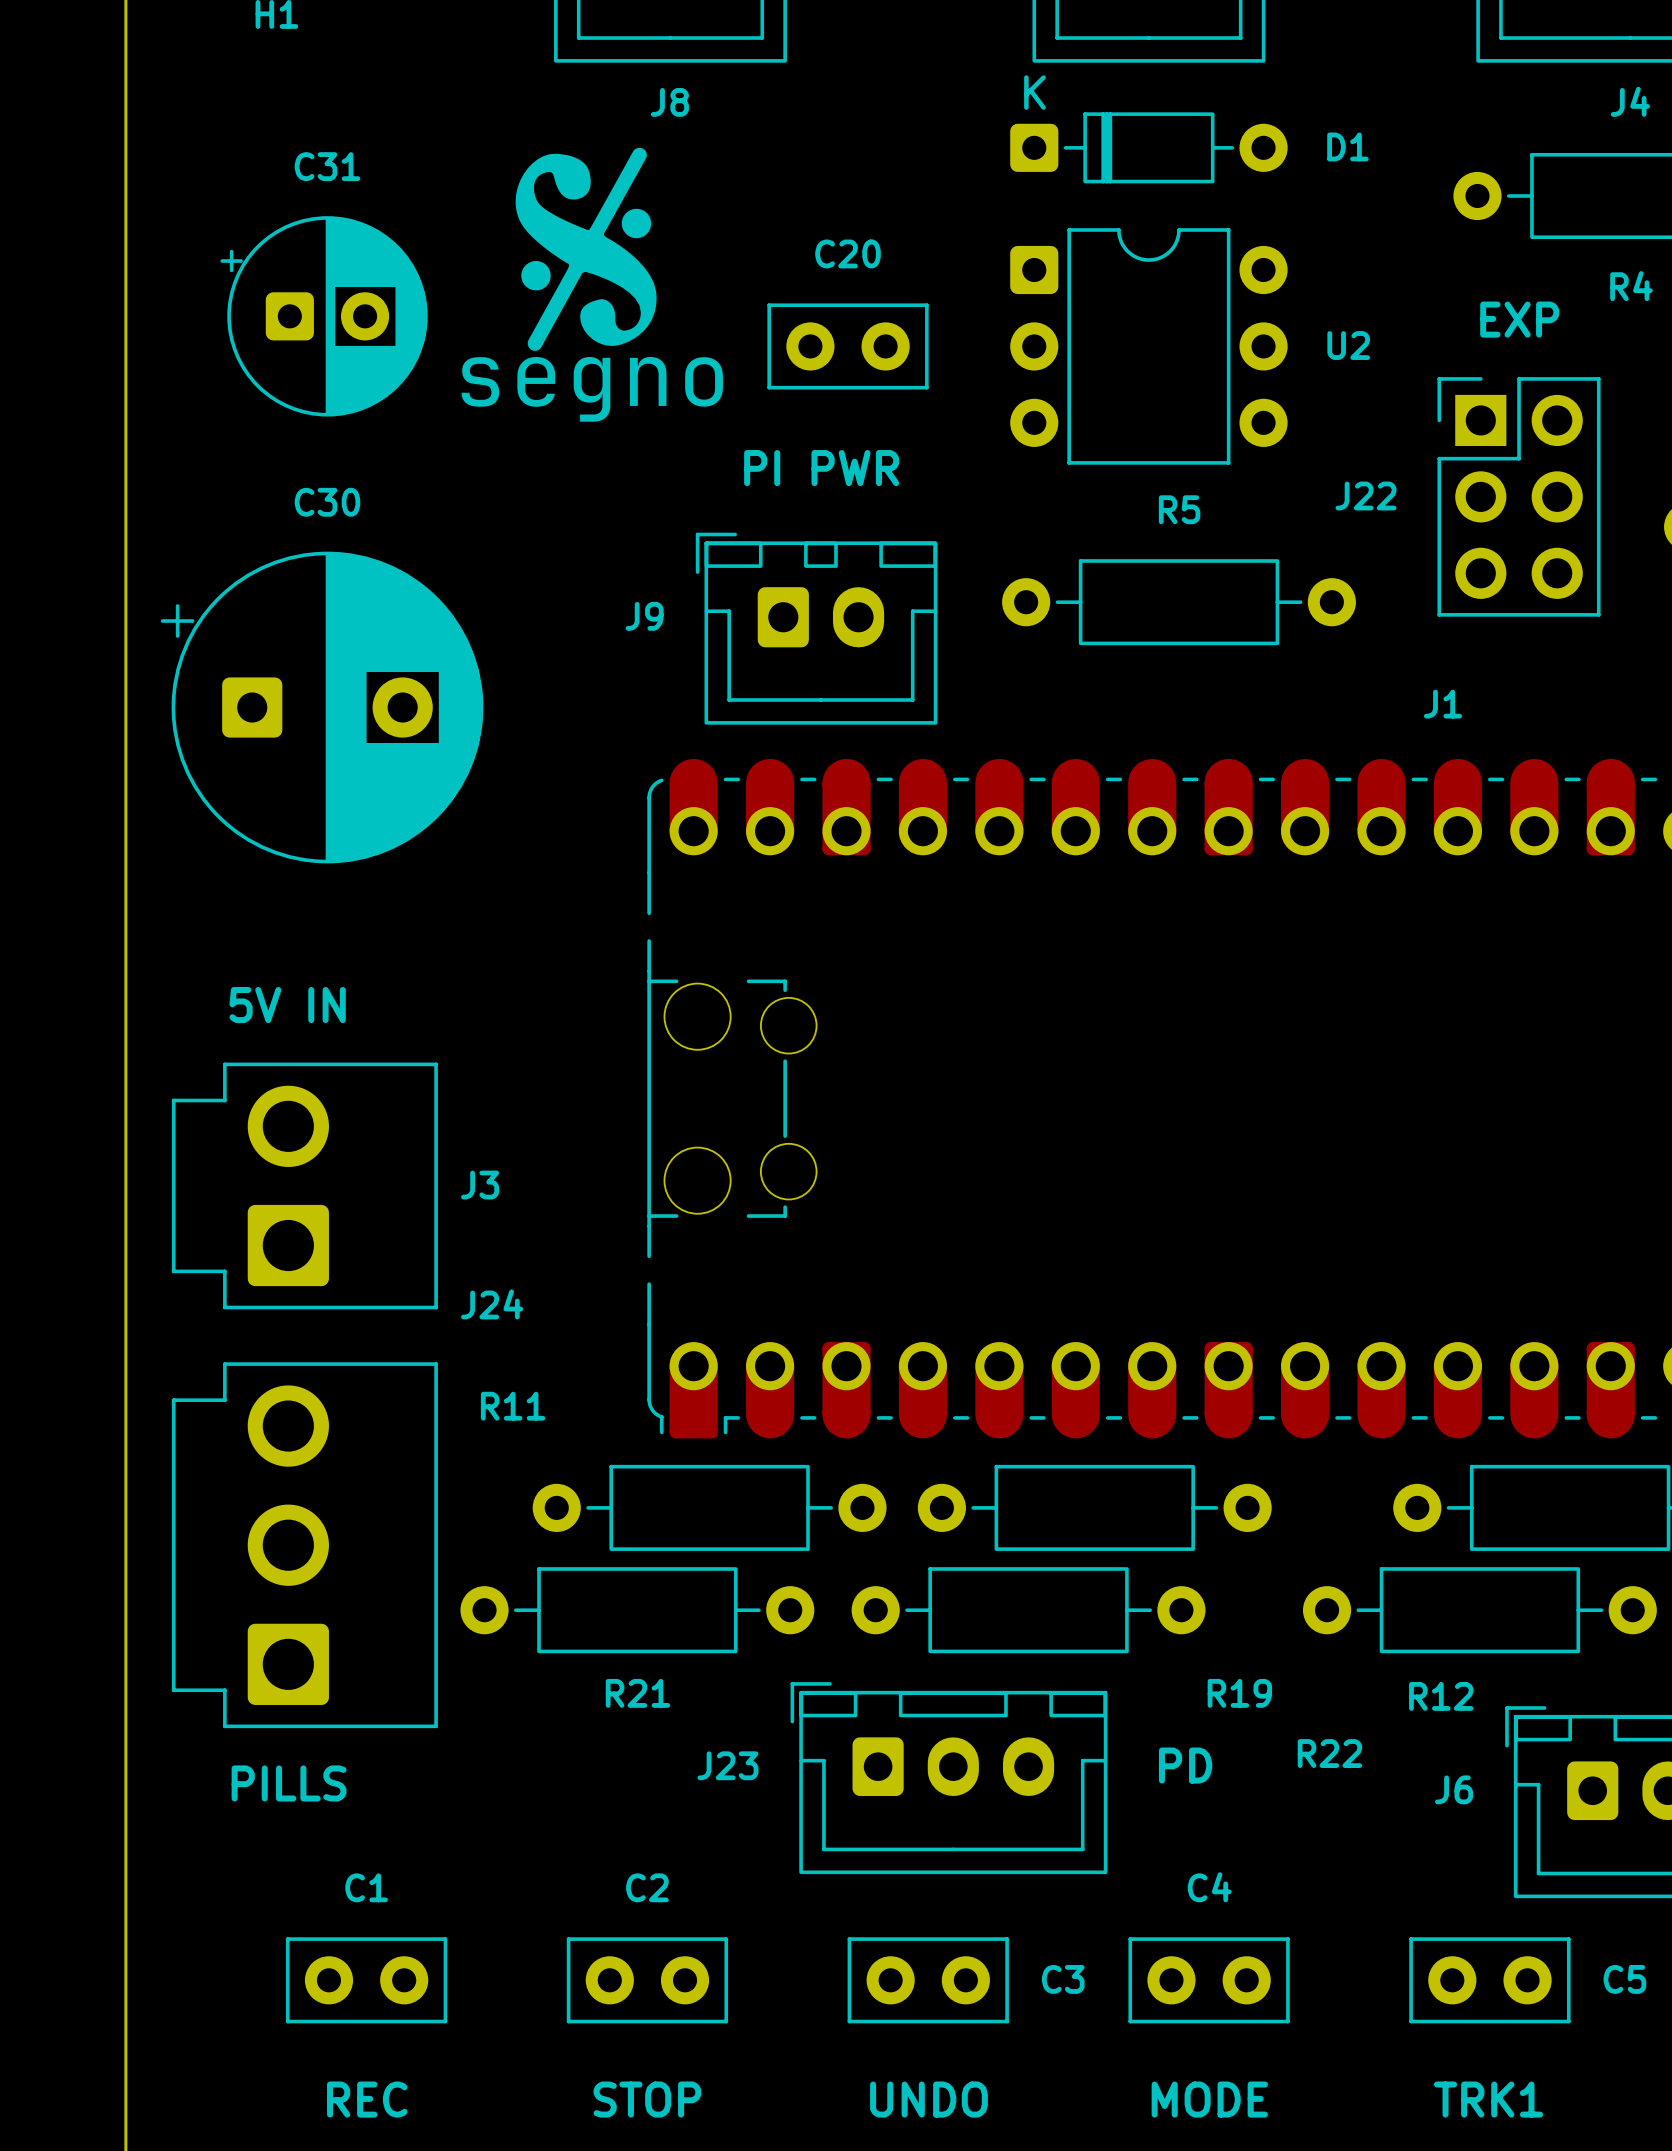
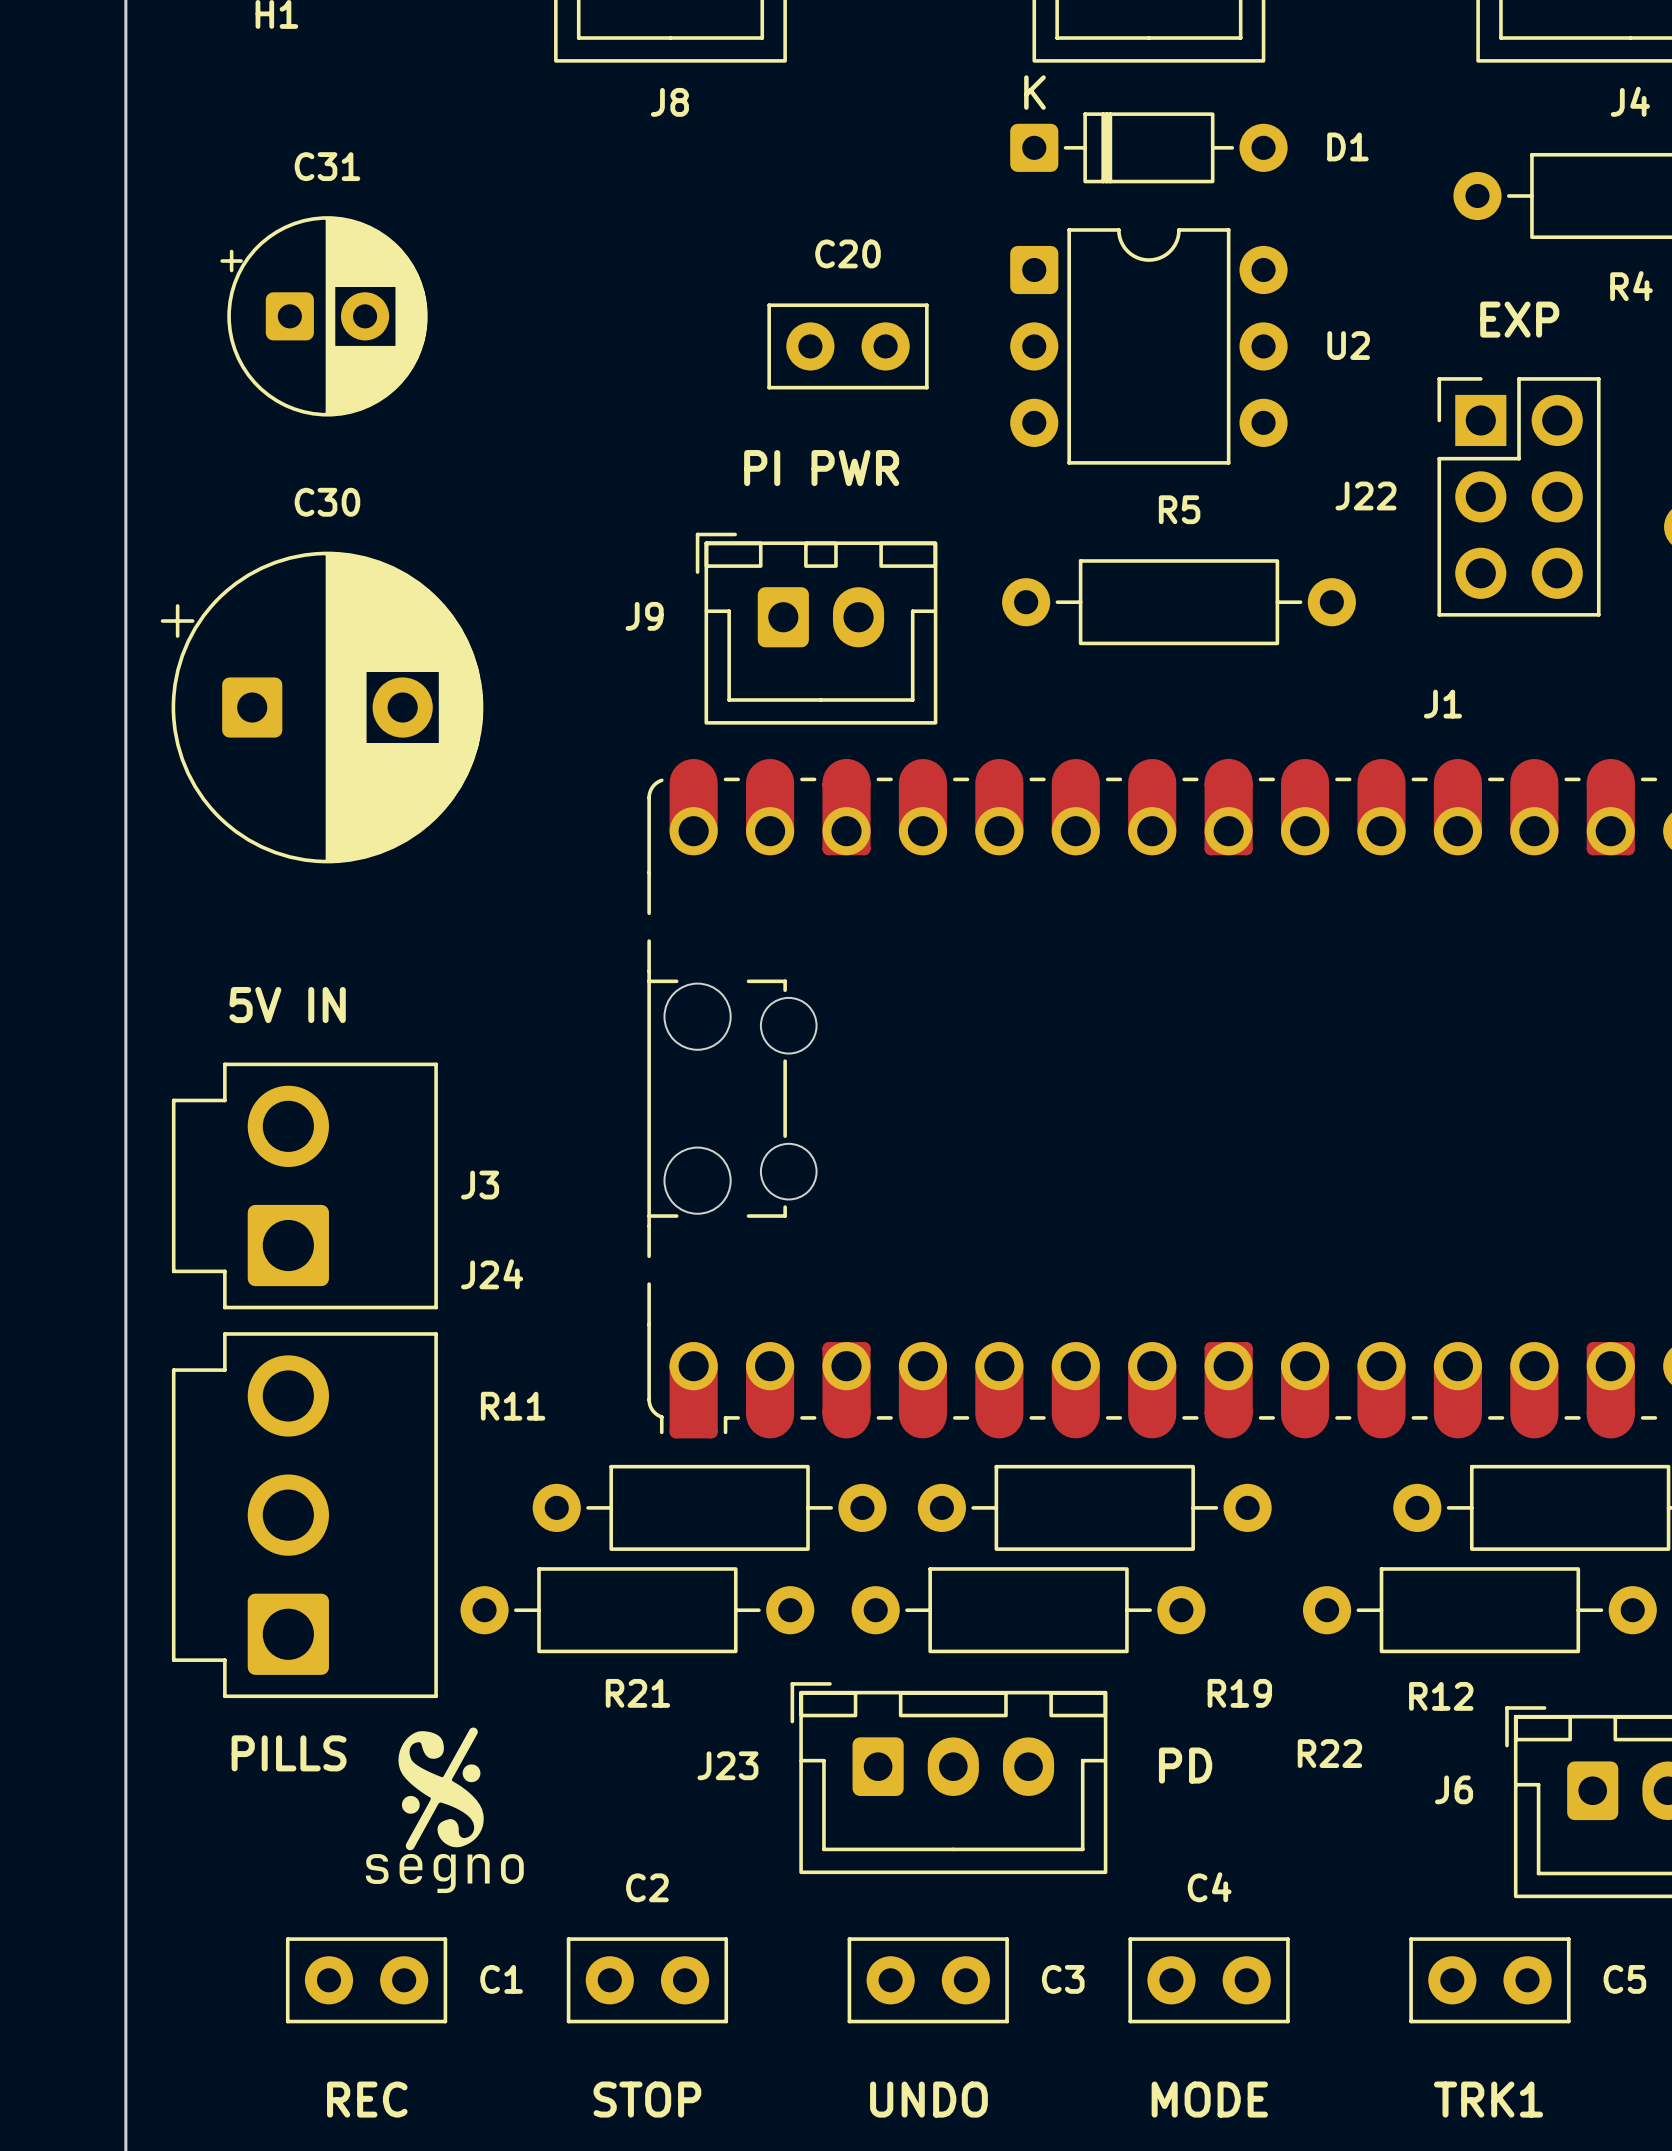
drawing: [461, 147, 723, 422] -> none
J24 position: (304, 1545) -> (304, 1515)
drawing: none -> [365, 1727, 524, 1894]
text position: PILLS (289, 1783) -> PILLS (289, 1753)
C1 name position: C1 (366, 1887) -> C1 (501, 1979)

